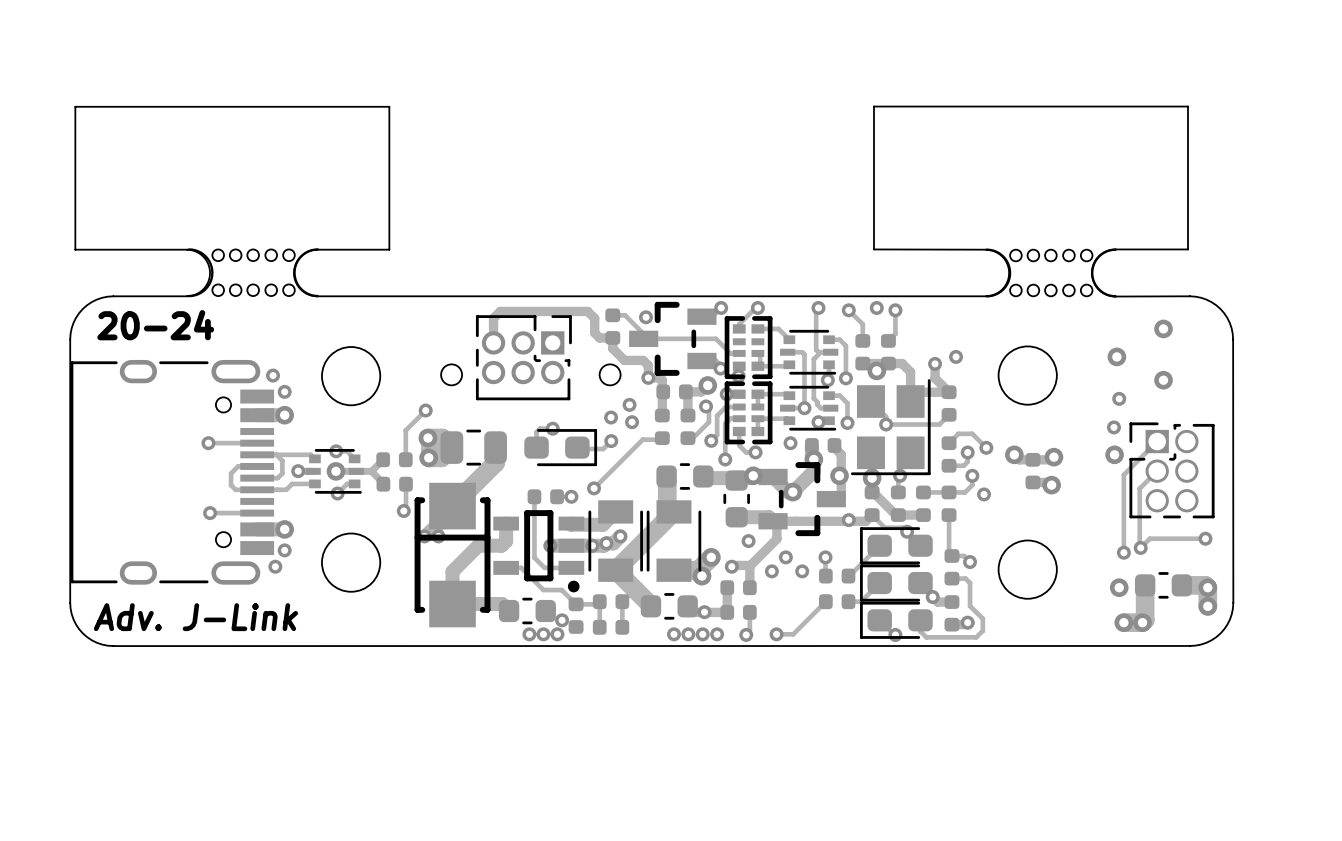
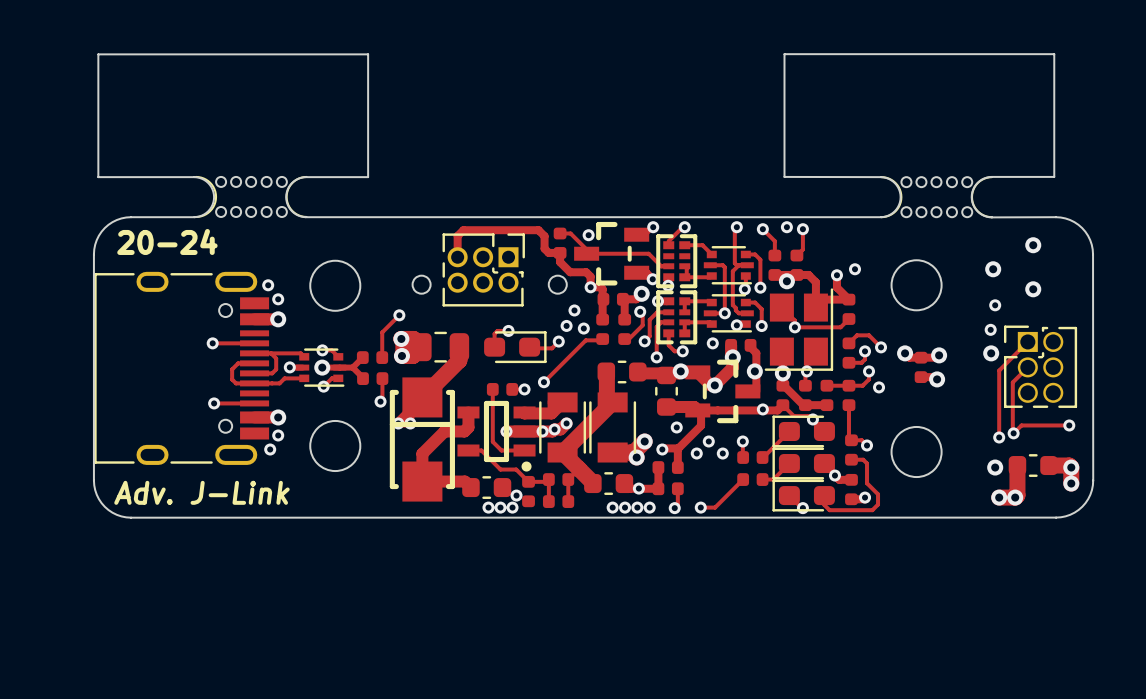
via: (611, 417) -> none
via: none -> (566, 325)
via: (632, 422) -> none
via: none -> (583, 328)

